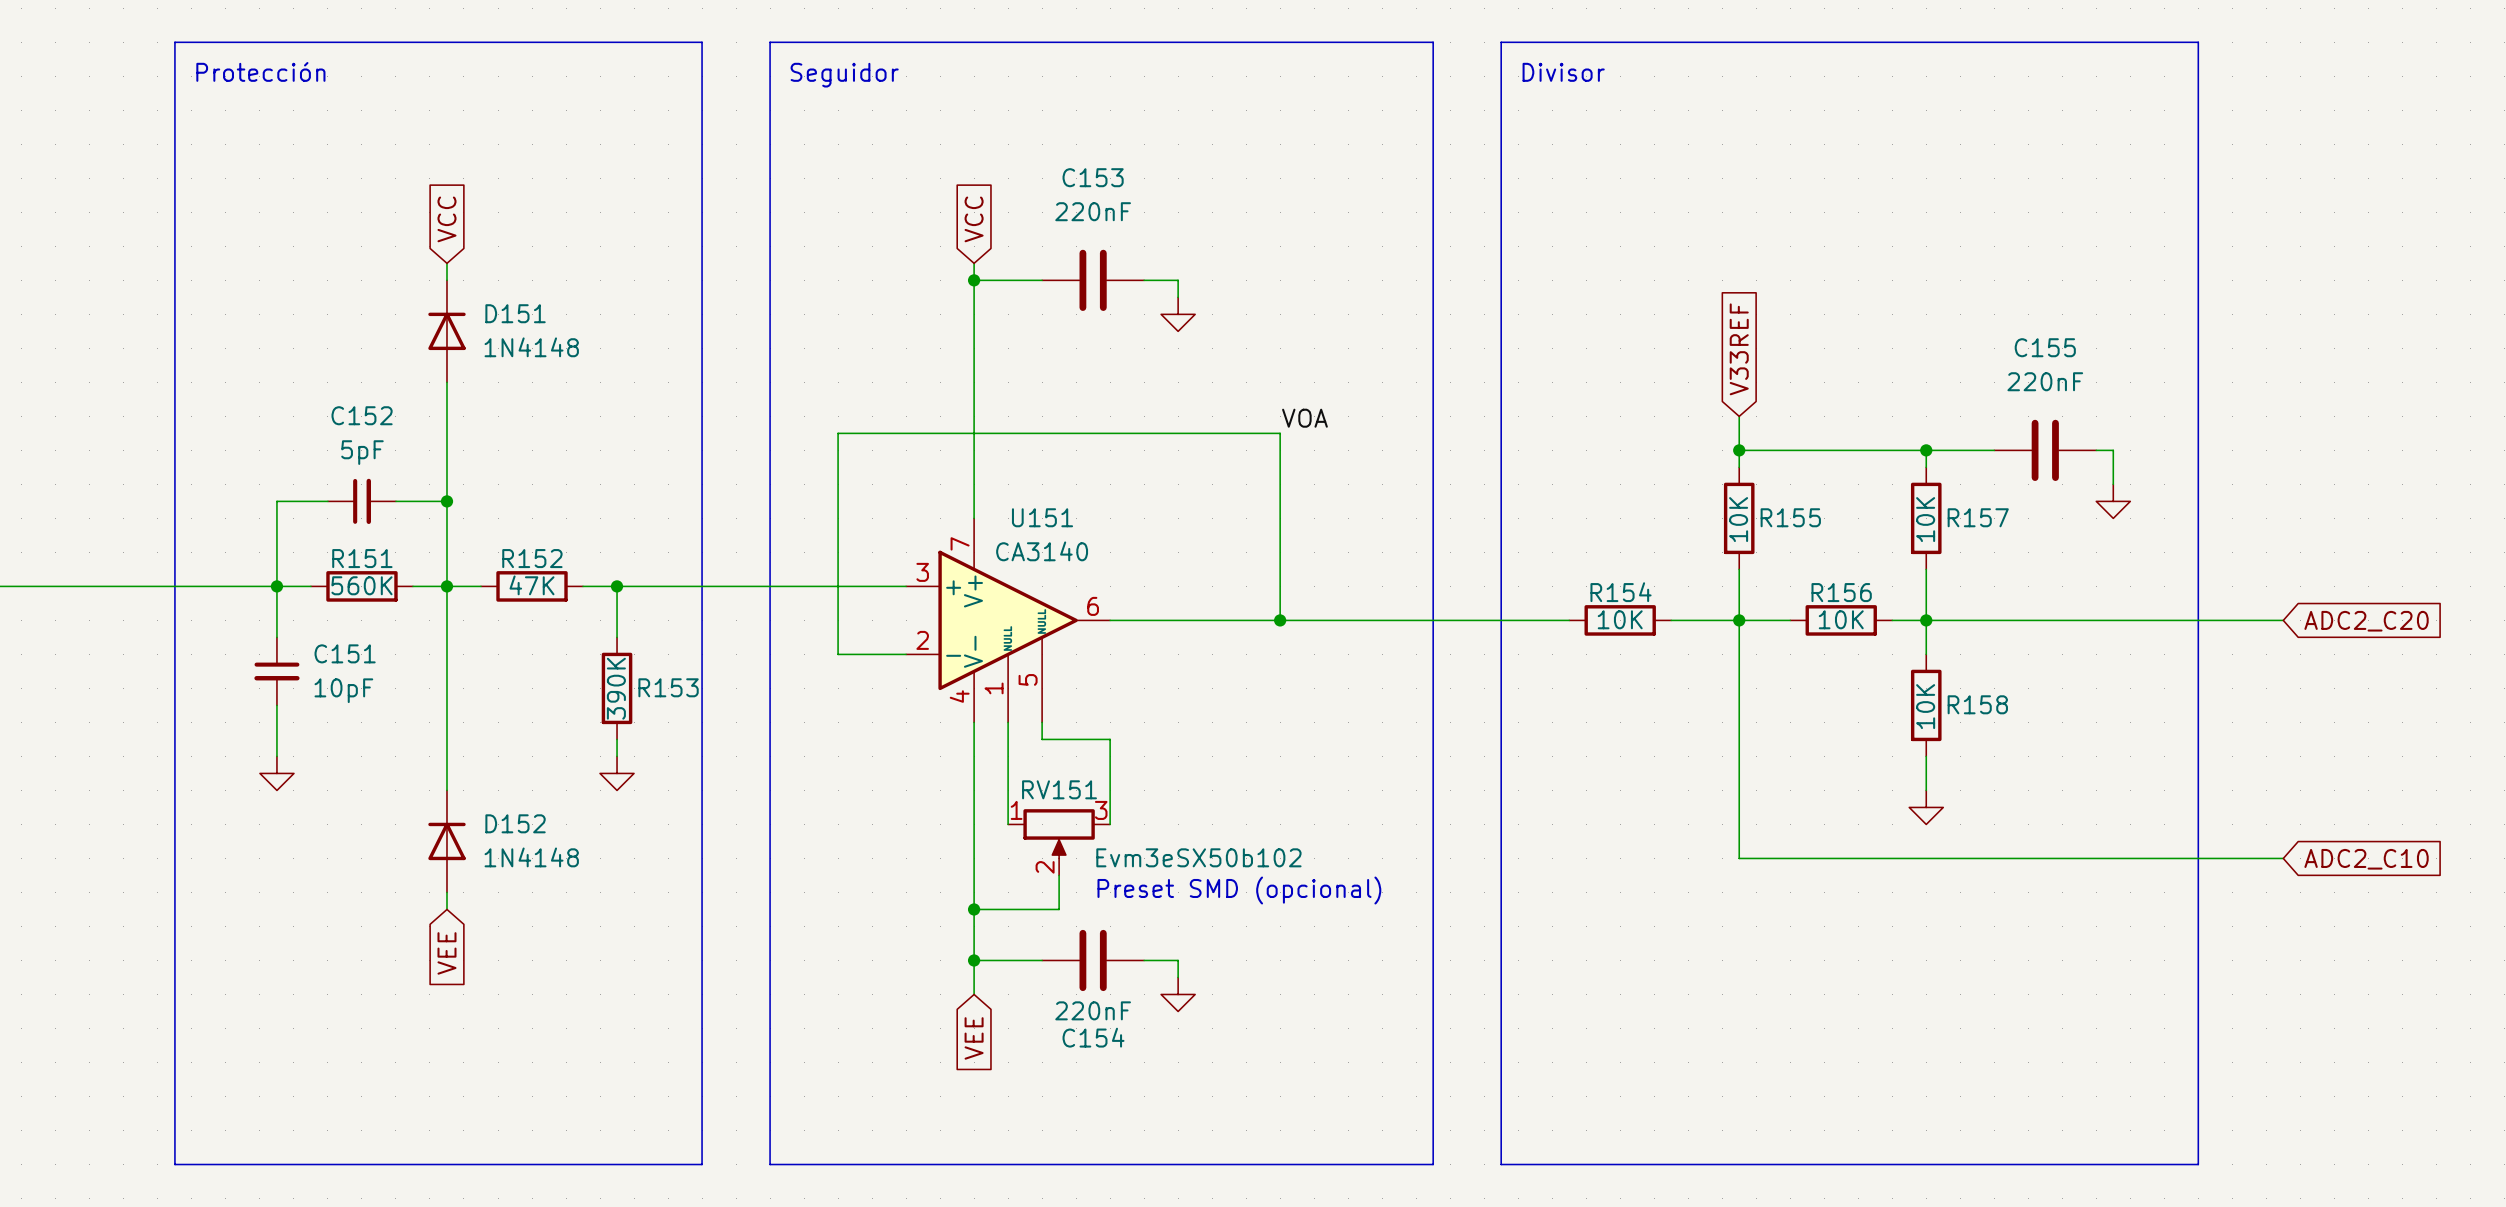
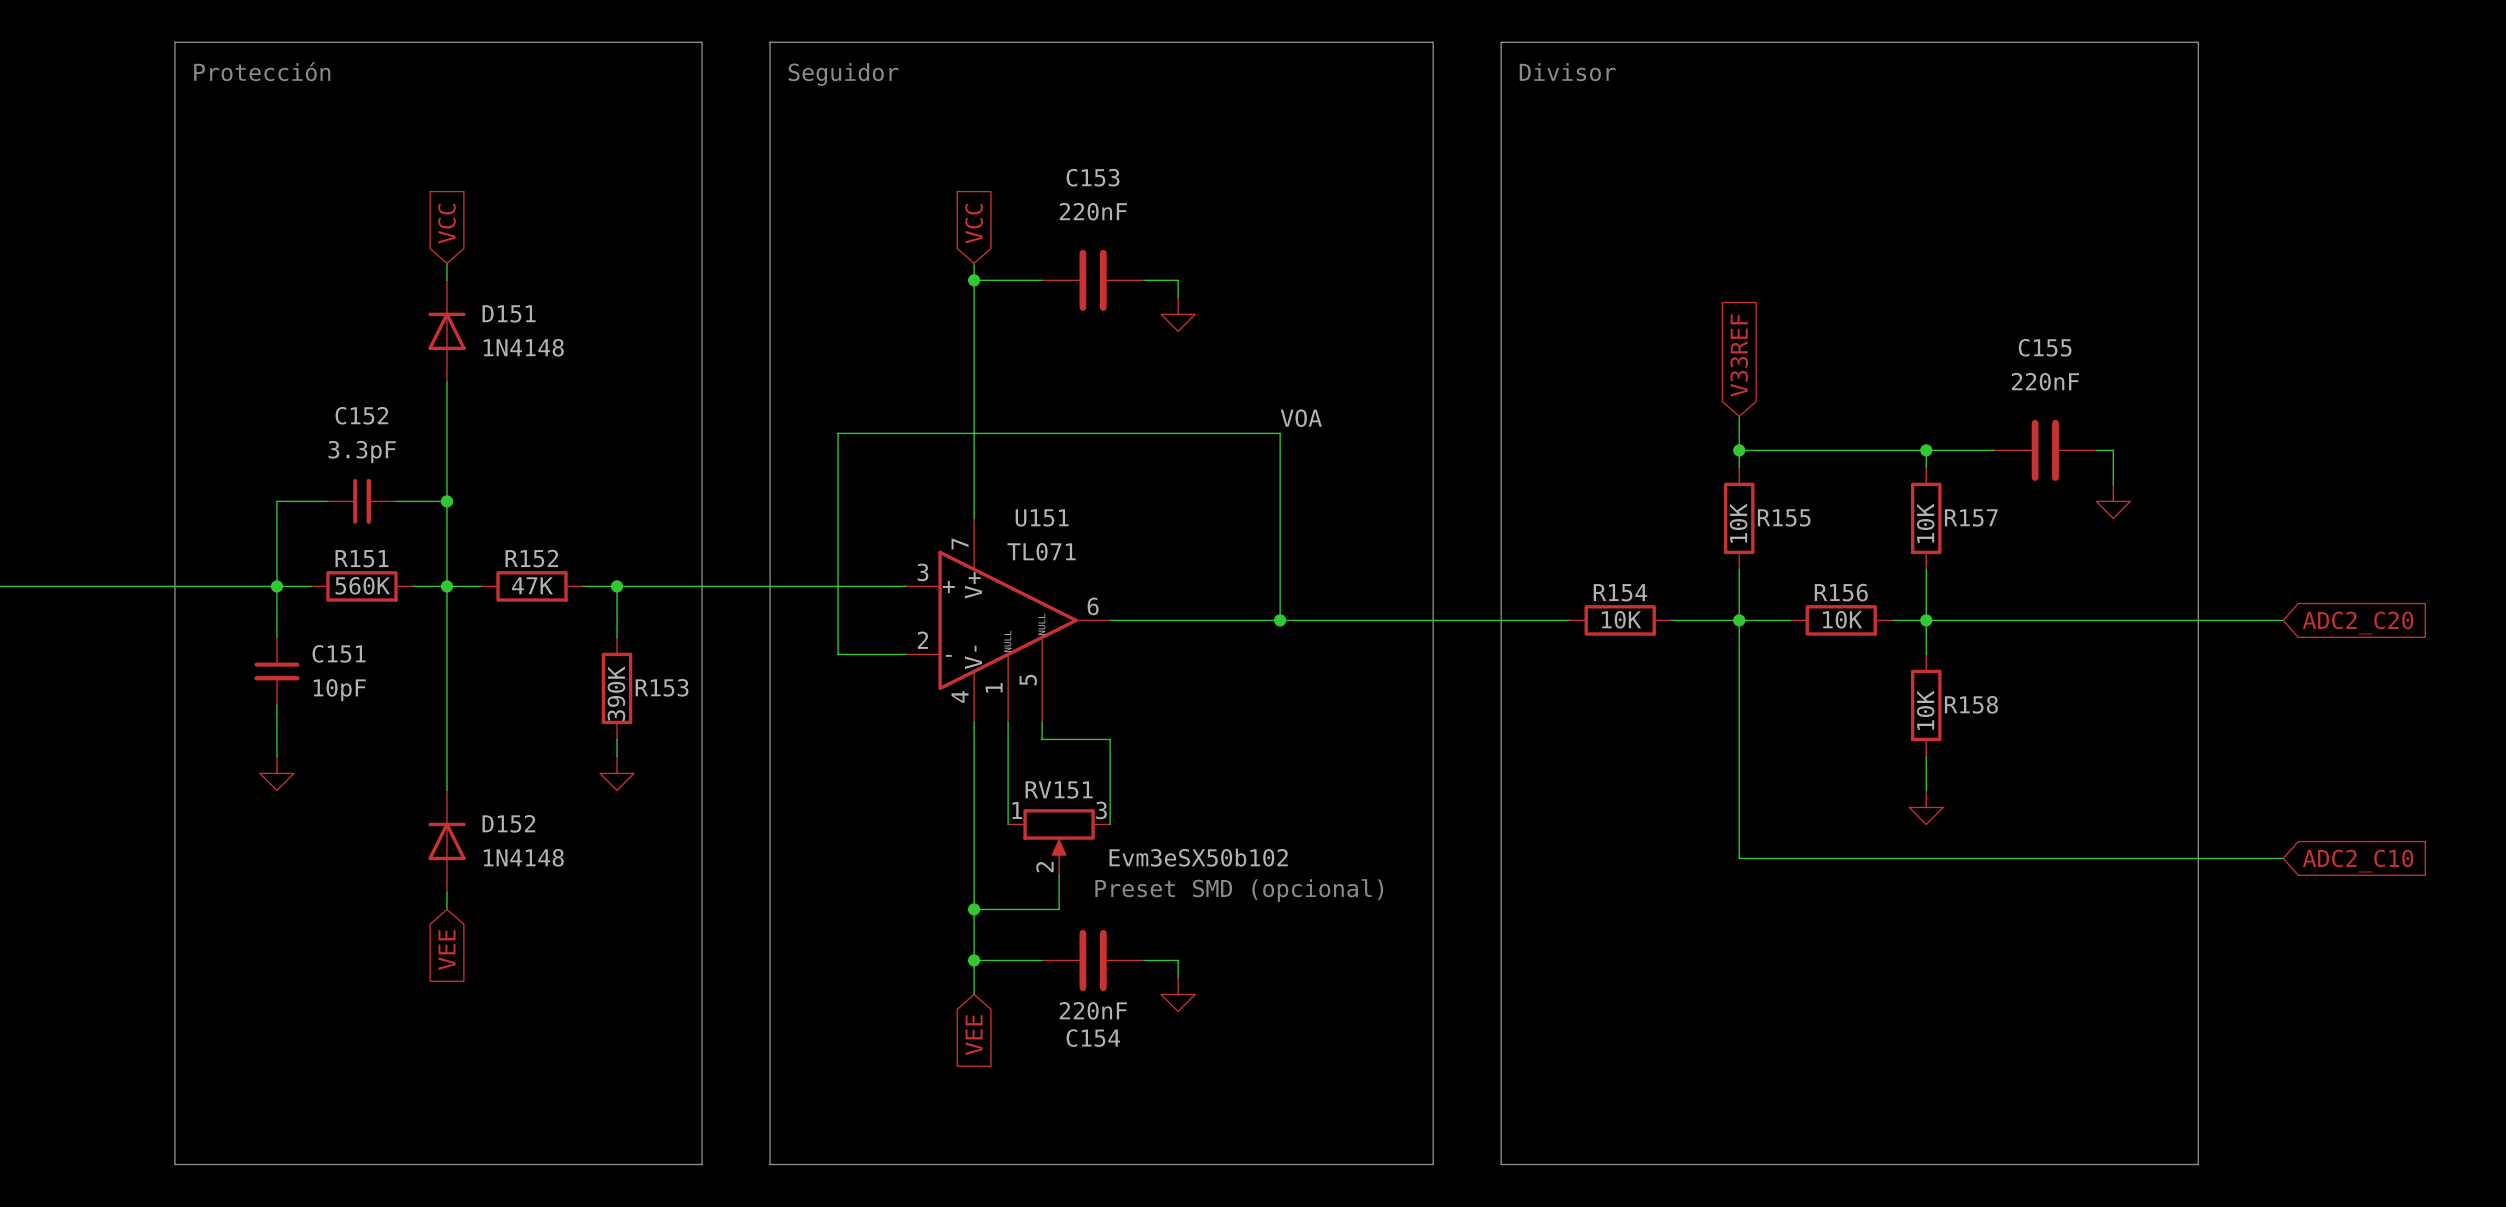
C152 value: 5pF (362, 452) -> 3.3pF (362, 452)
U151 value: CA3140 (1042, 551) -> TL071 (1041, 551)

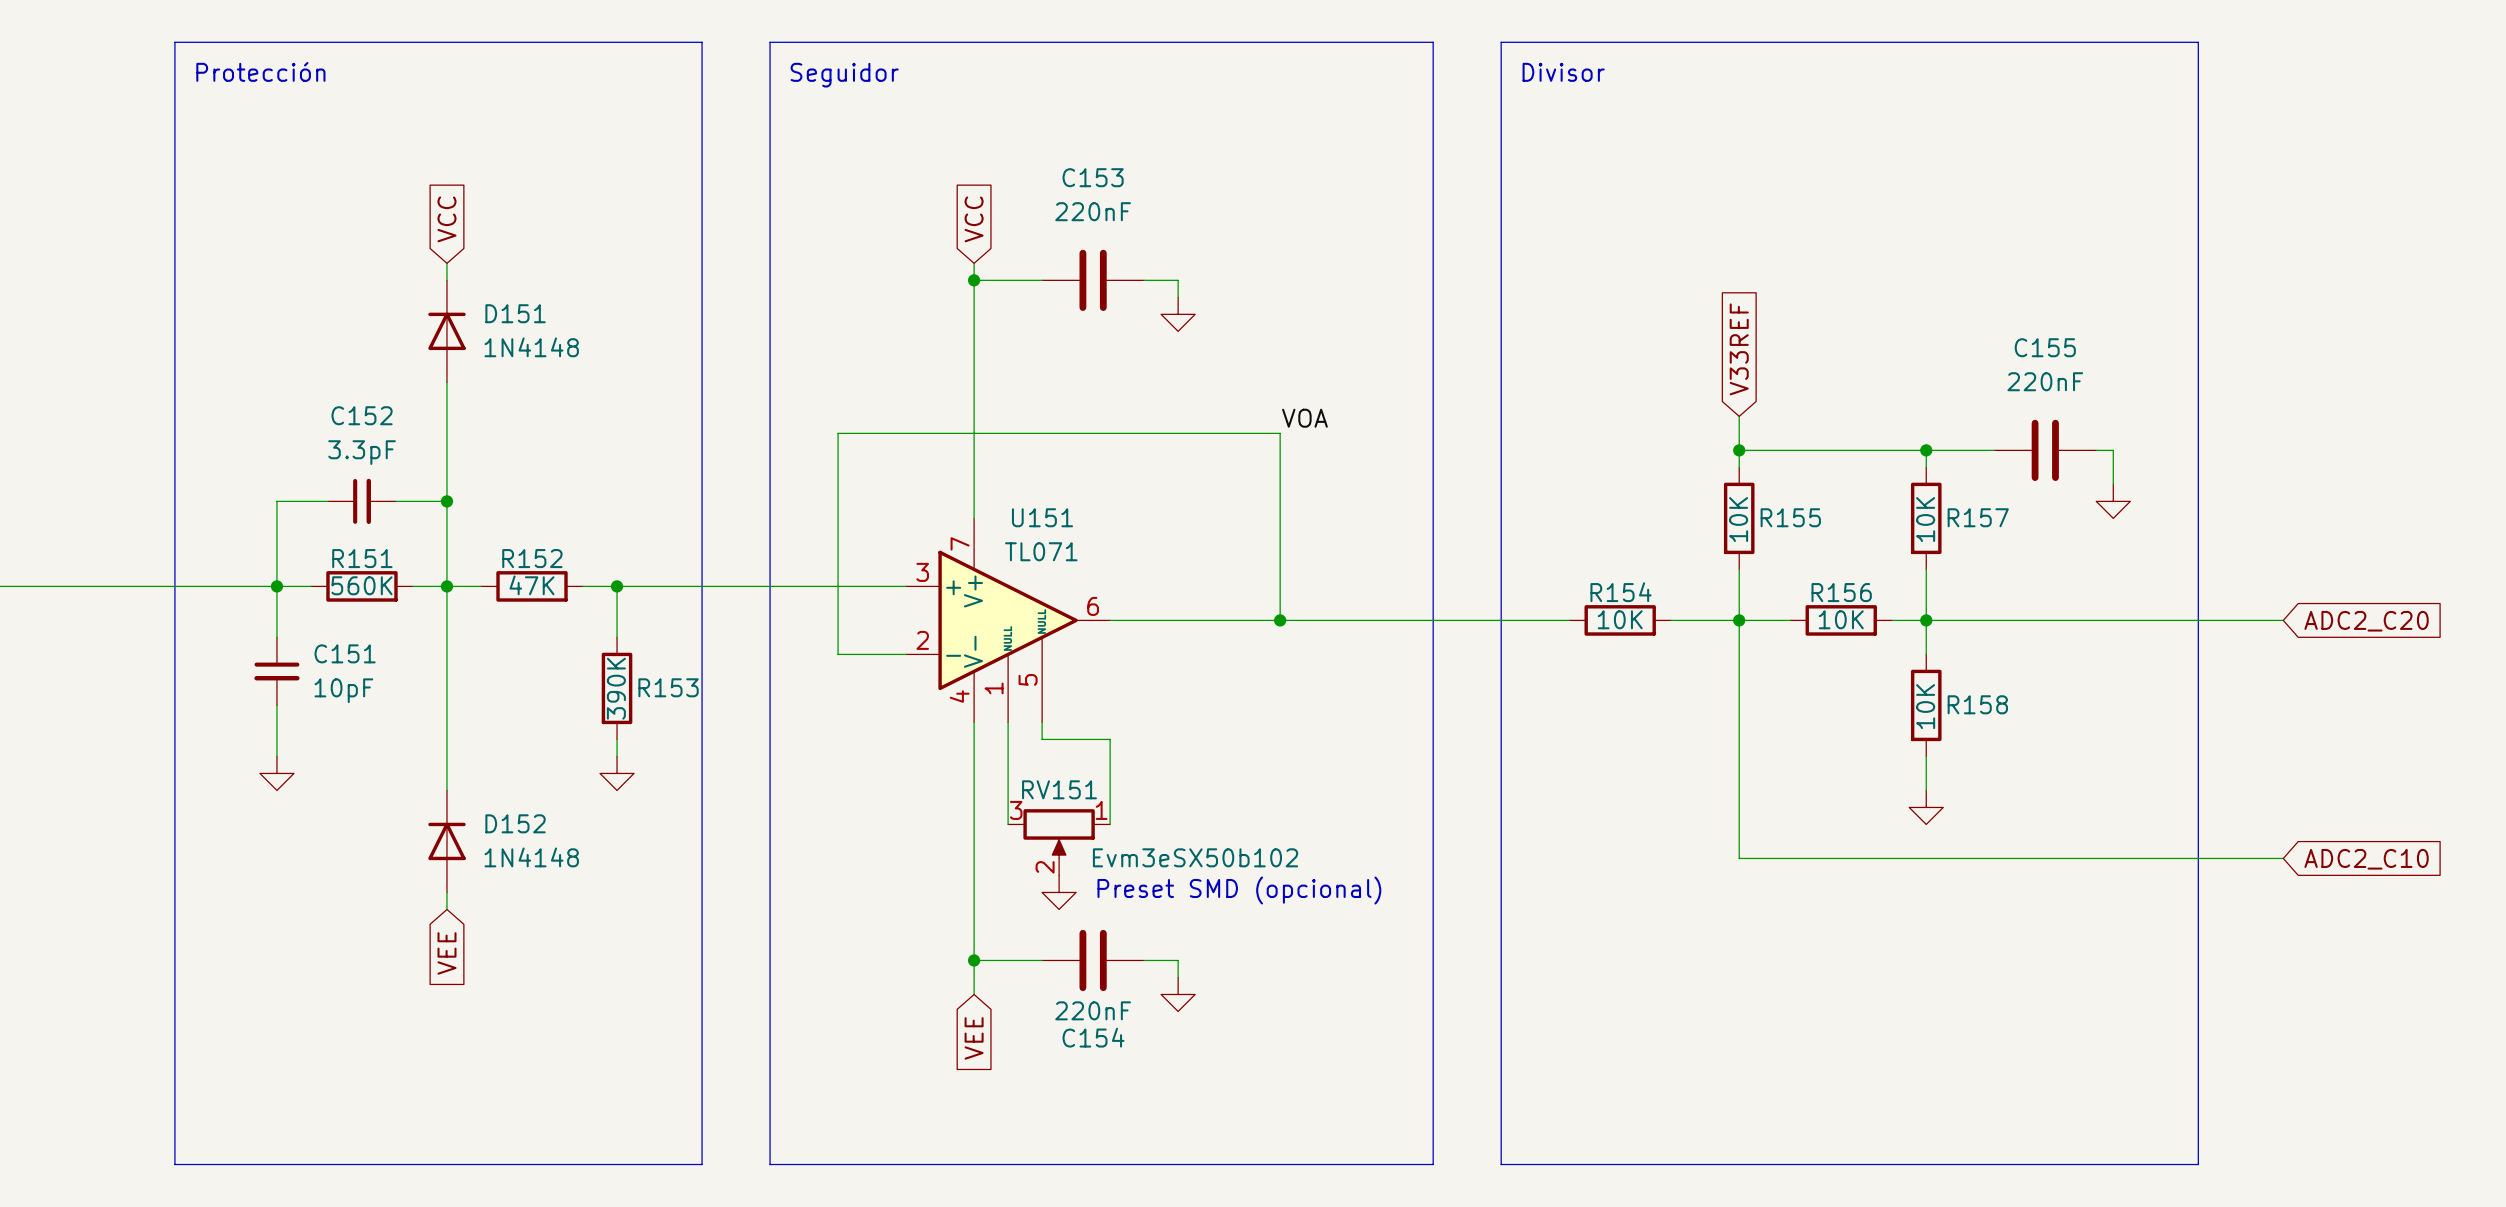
RV151 flip: as is (1059, 833) -> left-right (1059, 833)
wire: (1059, 875) (1059, 909) (974, 909) -> none
power symbol: none -> (1059, 892)
junction: (974, 909) -> none

